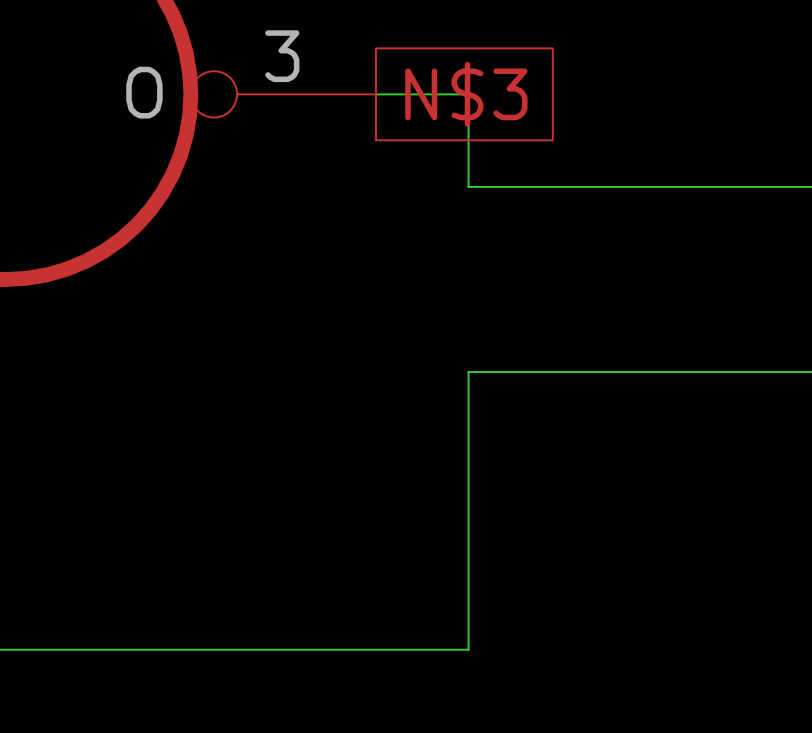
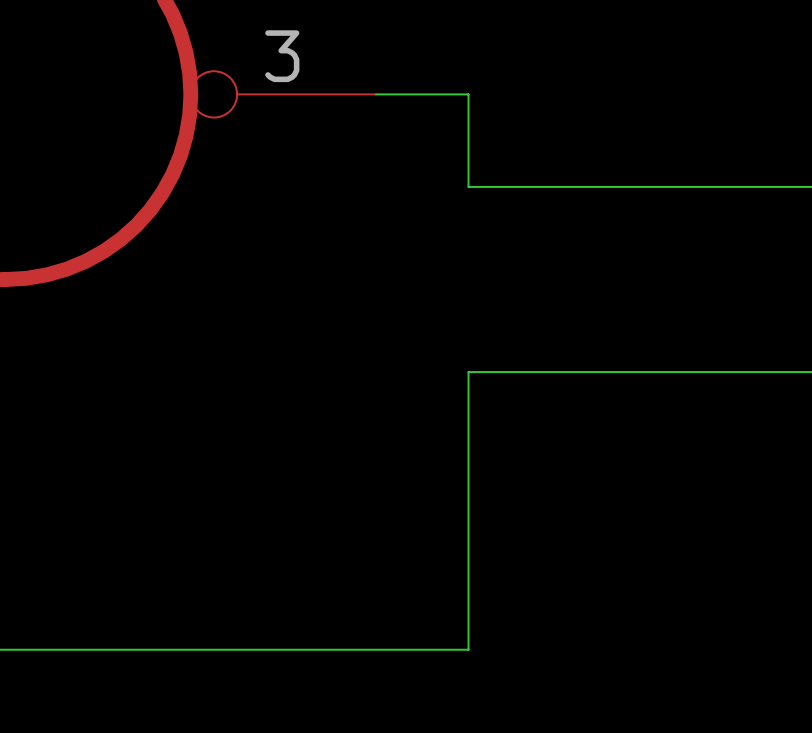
part pin name: O (144, 92) -> none
global label: N$3 (466, 94) -> none

